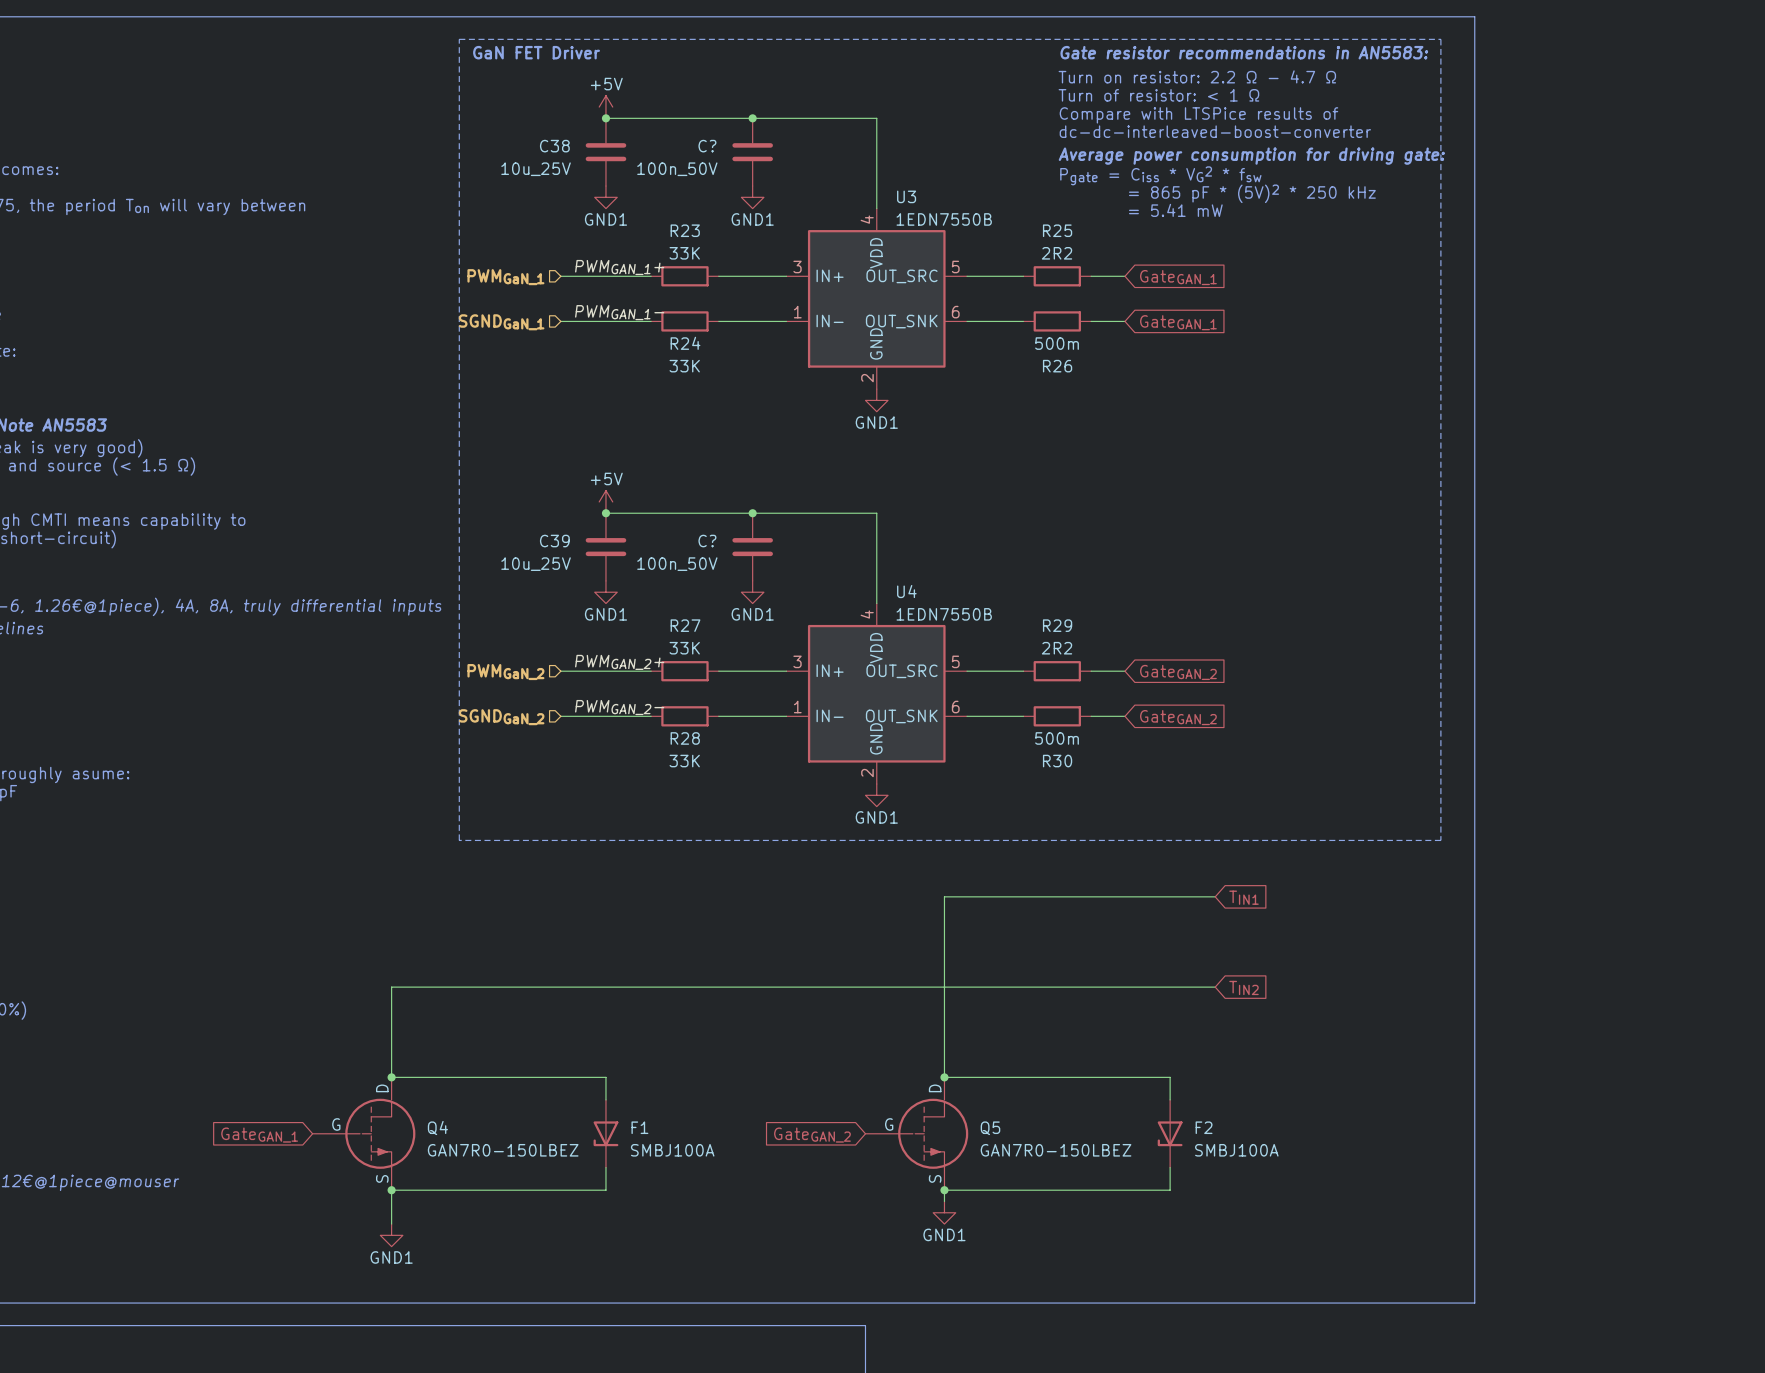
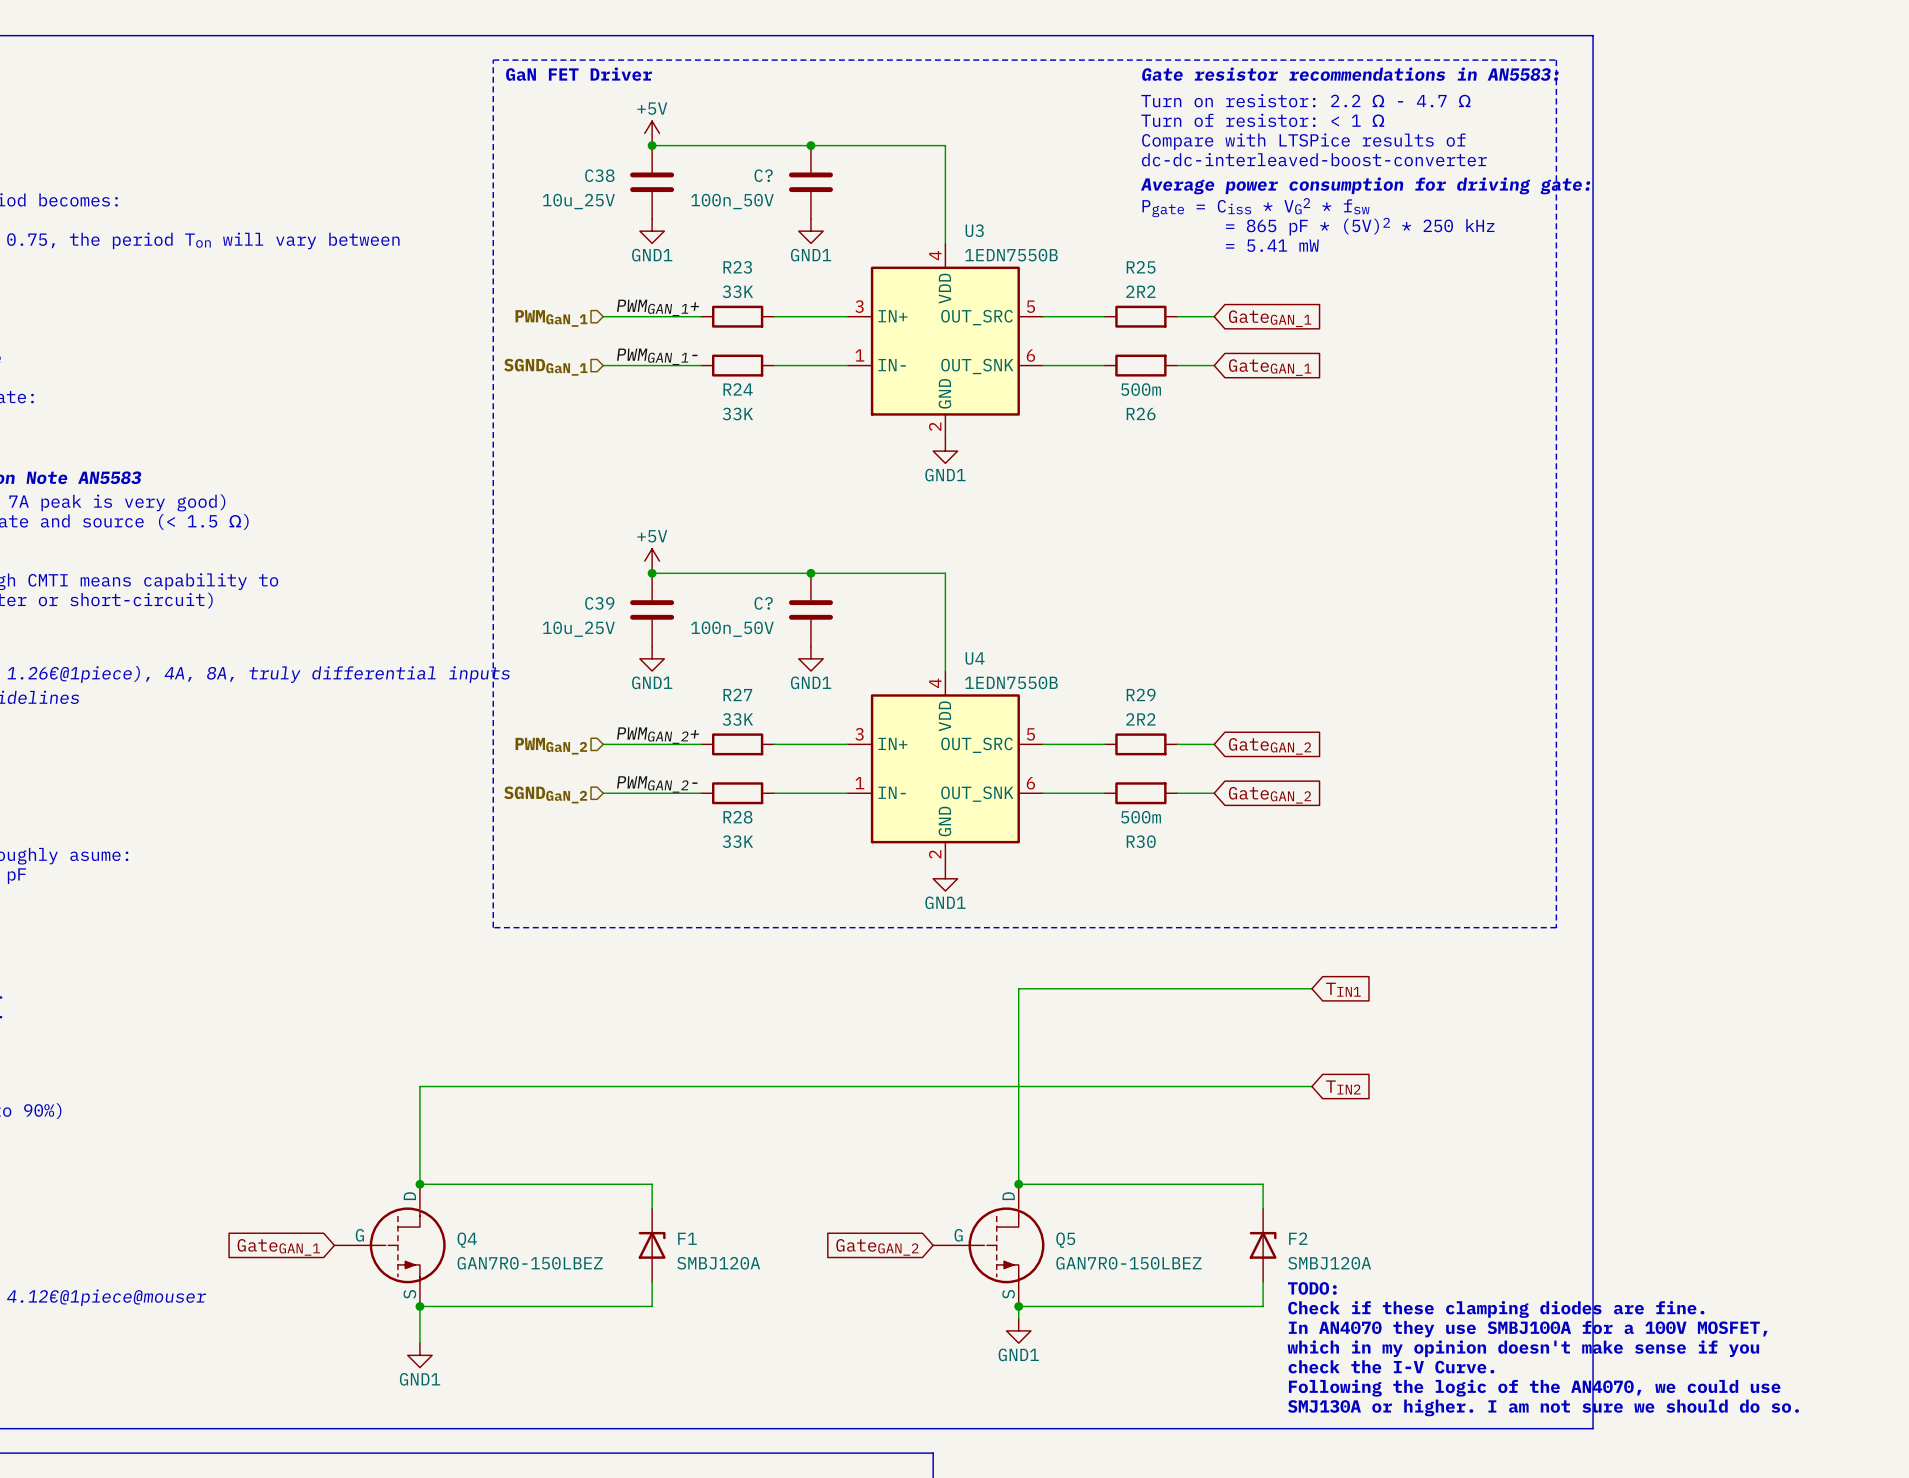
F1 rotation: 0° (605, 1133) -> 180° (652, 1245)
F2 rotation: 0° (1170, 1133) -> 180° (1263, 1245)
F1 value: SMBJ100A (672, 1150) -> SMBJ120A (718, 1263)
F2 value: SMBJ100A (1236, 1150) -> SMBJ120A (1329, 1263)
text: none -> TODO: (1312, 1288)
text: none -> Check if these clamping diodes are fine. (1496, 1309)
text: none -> In AN4070 they use SMBJ100A for a 100V MOSFET, (1528, 1329)
text: none -> which in my opinion doesn't make sense if you (1523, 1348)
text: none -> check the I-V Curve. (1391, 1366)
text: none -> Following the logic of the AN4070, we could use (1534, 1388)
text: none -> SMJ130A or higher. I am not sure we should do so. (1543, 1407)

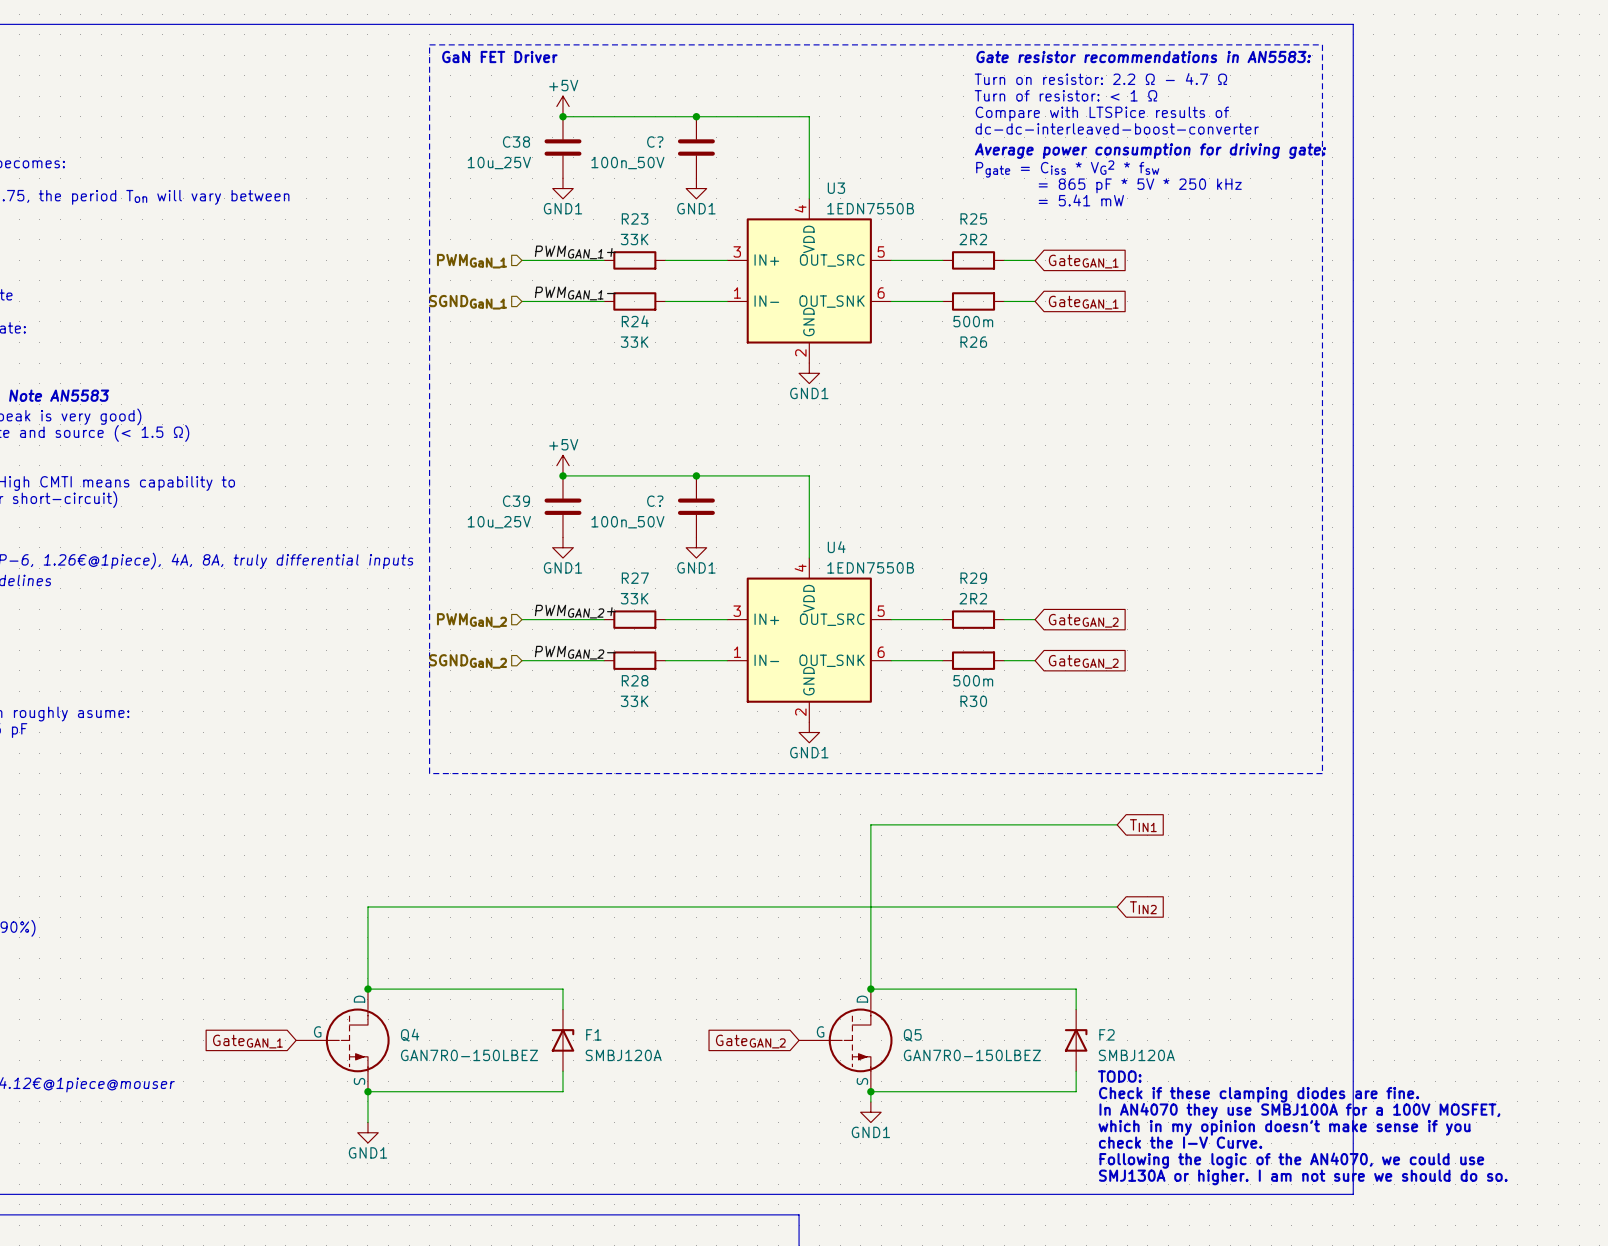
text: = 865 pF * (5V)2 * 250 kHz (1360, 226) -> = 865 pF * 5V * 250 kHz (1140, 185)

